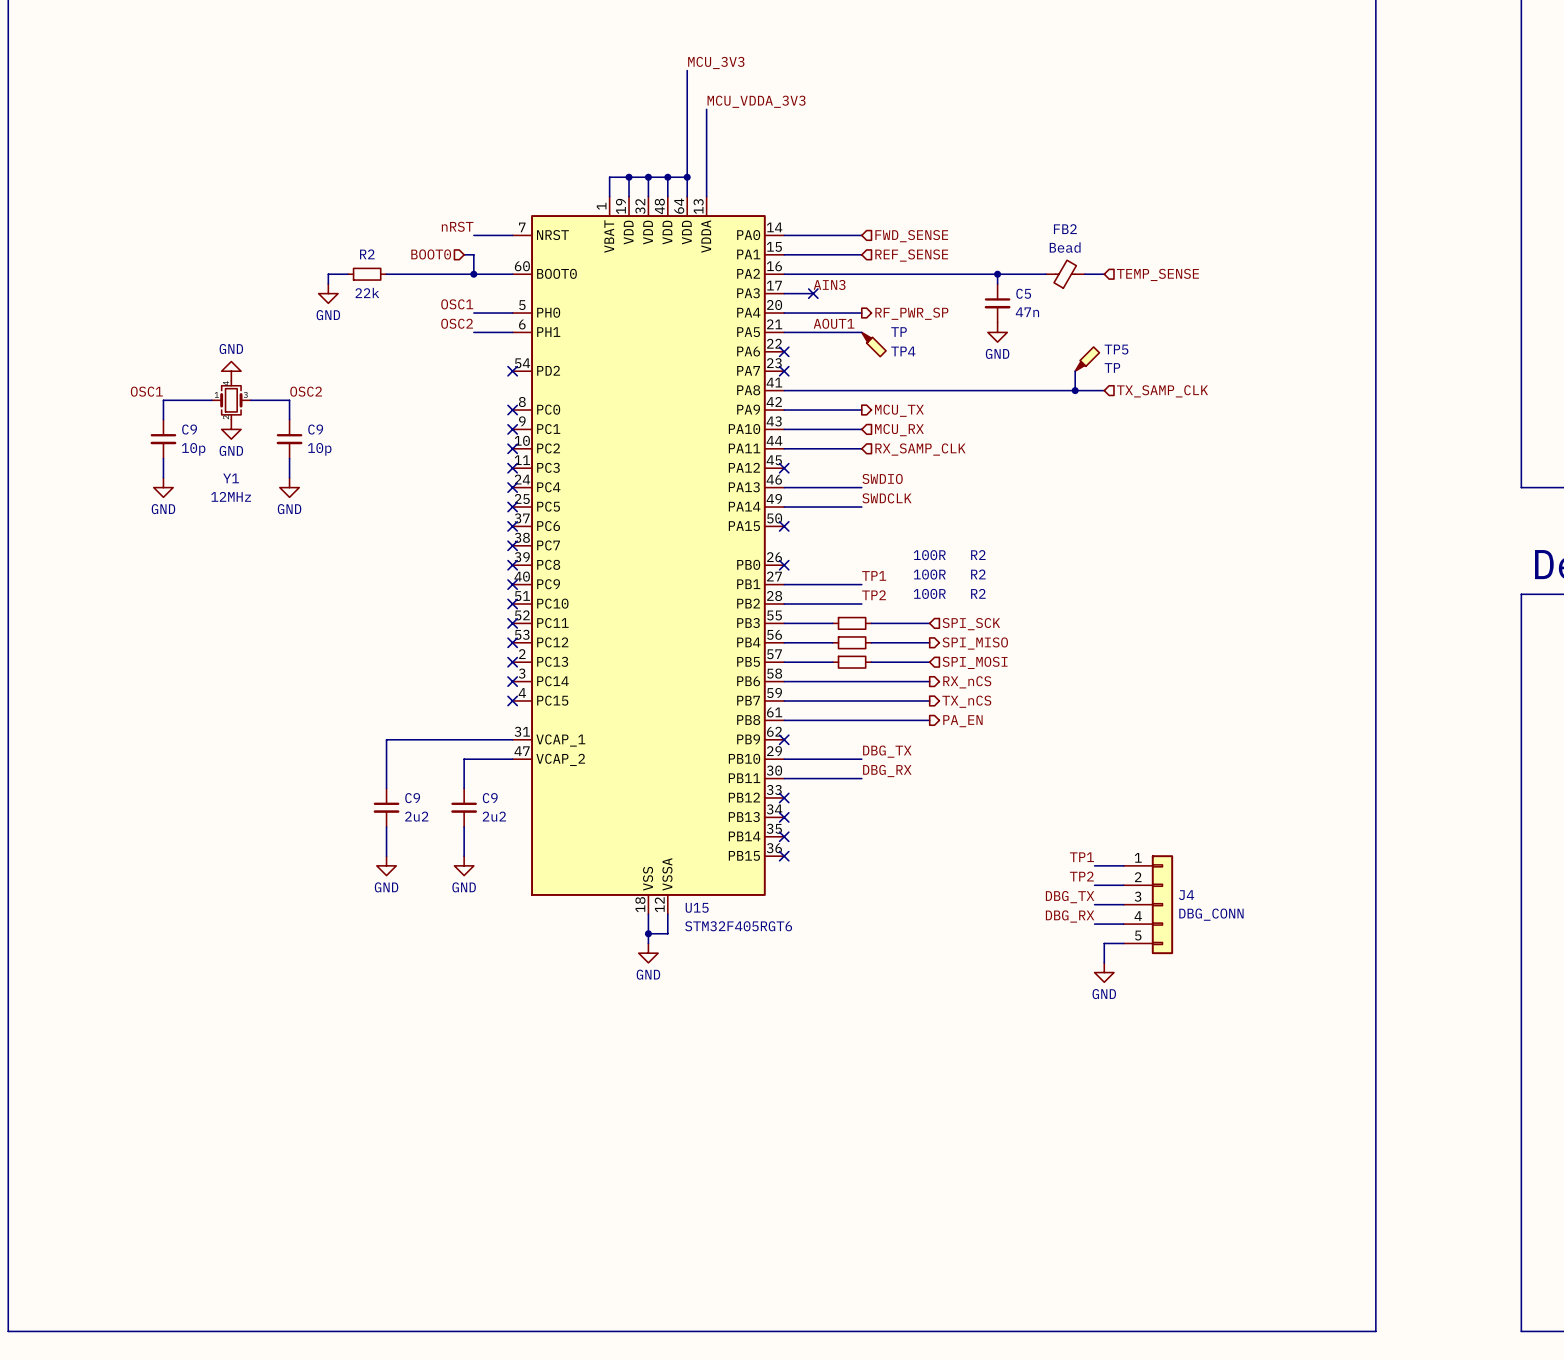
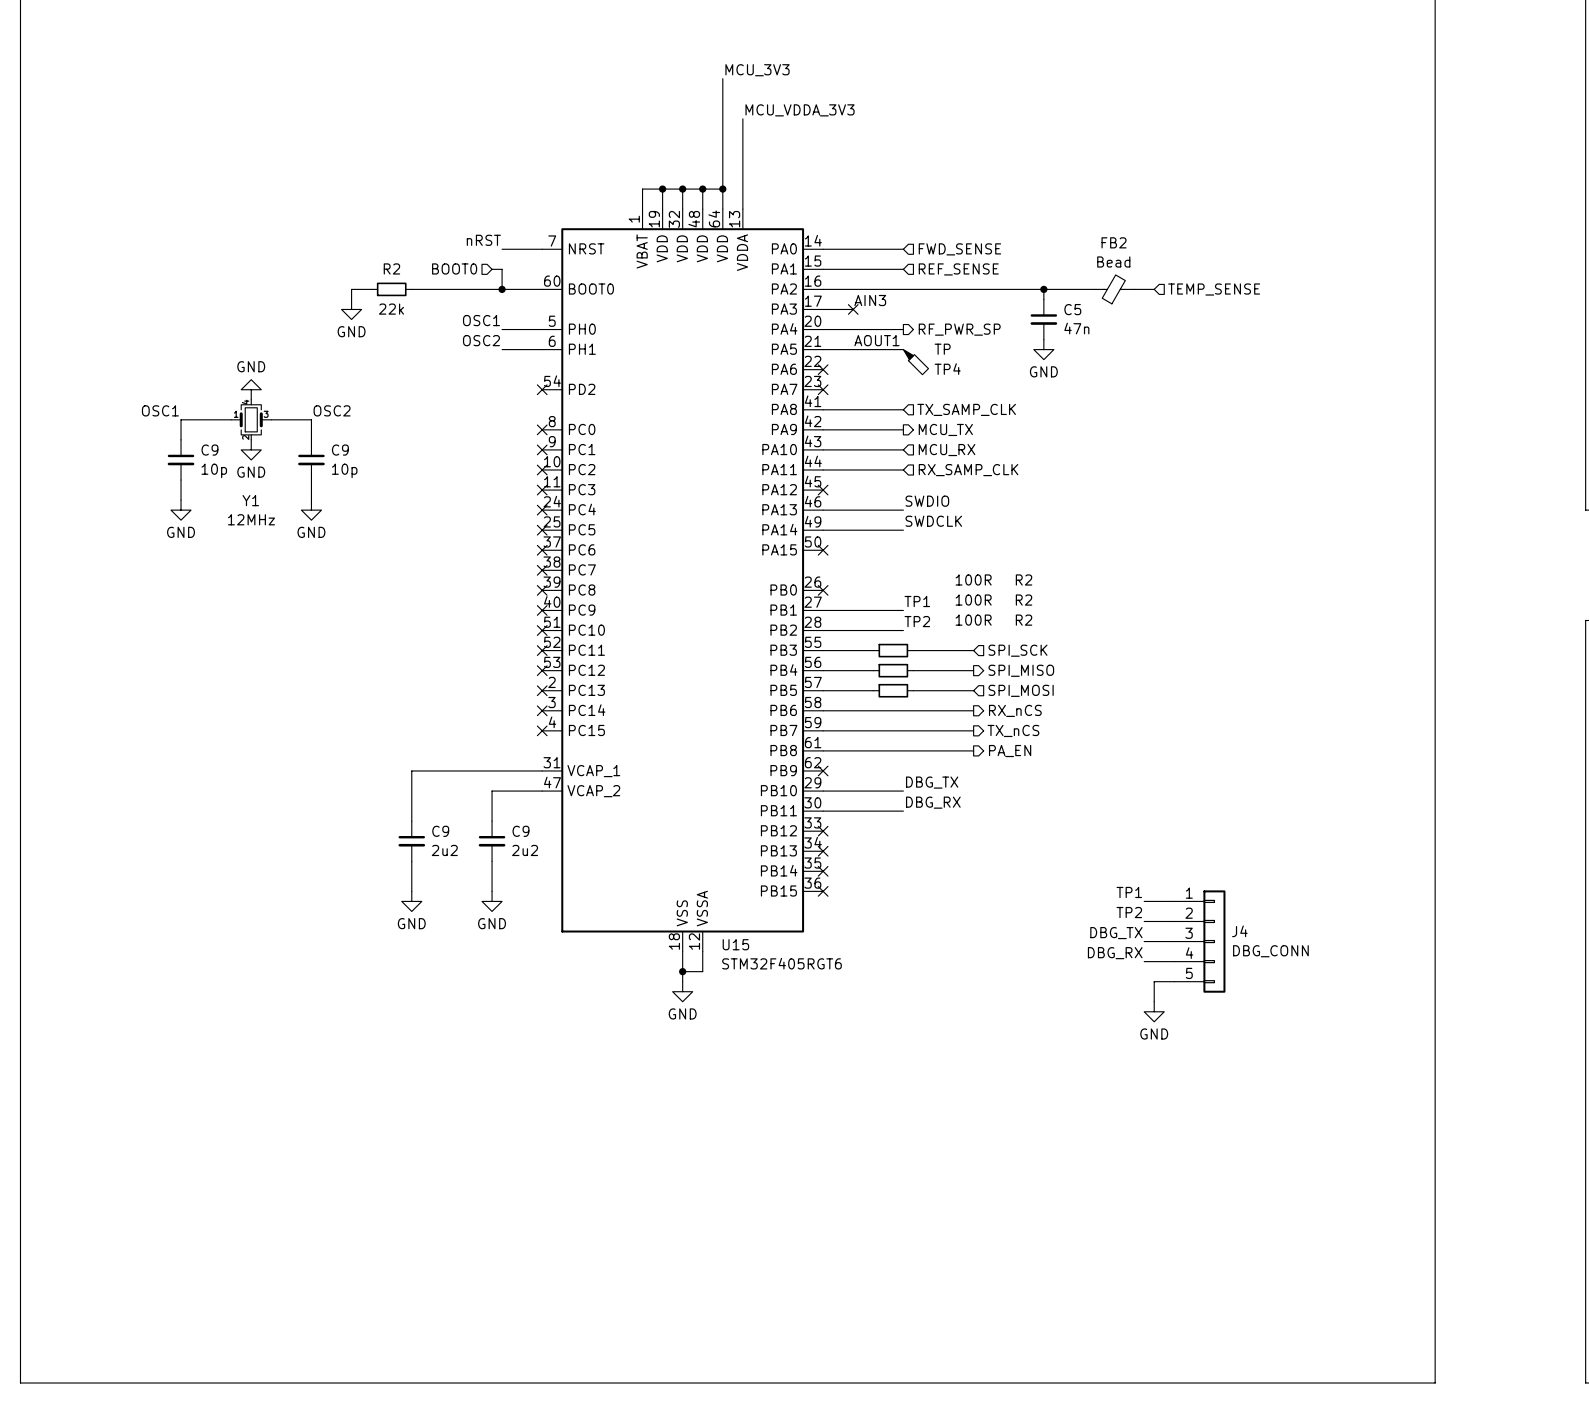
TP5: TP (1087, 359) -> none
wire: (1075, 371) (1075, 390) -> none
wire: (861, 390) (1104, 390) -> none
junction: (1075, 390) -> none
hierarchical label: none -> TX_SAMP_CLK (966, 409)
hierarchical label: TX_SAMP_CLK (1162, 391) -> none

